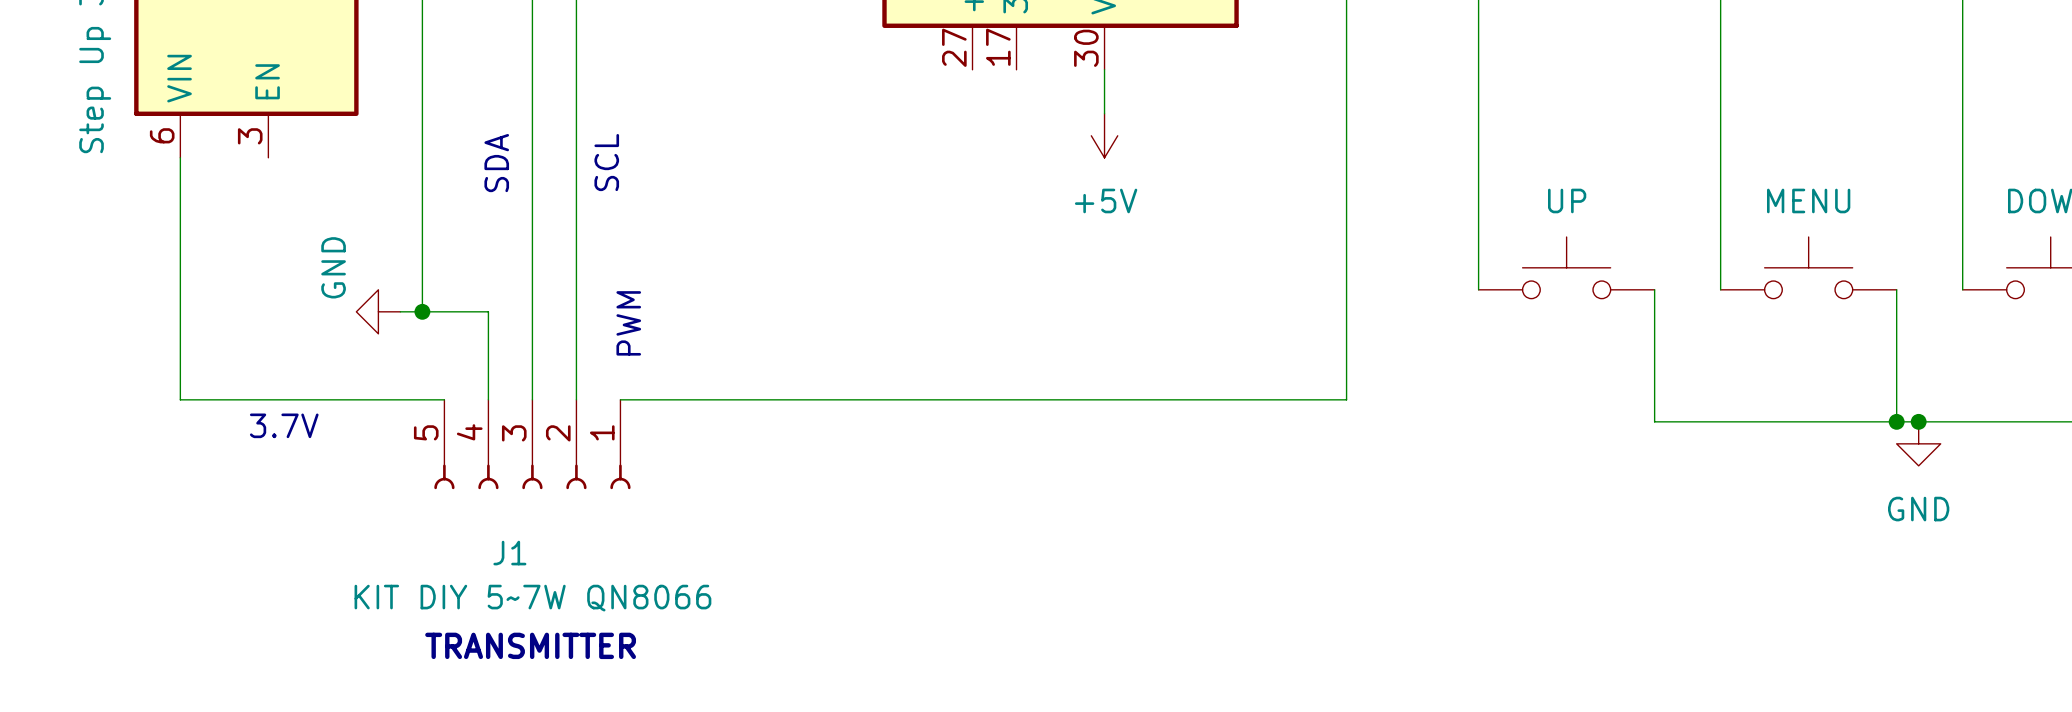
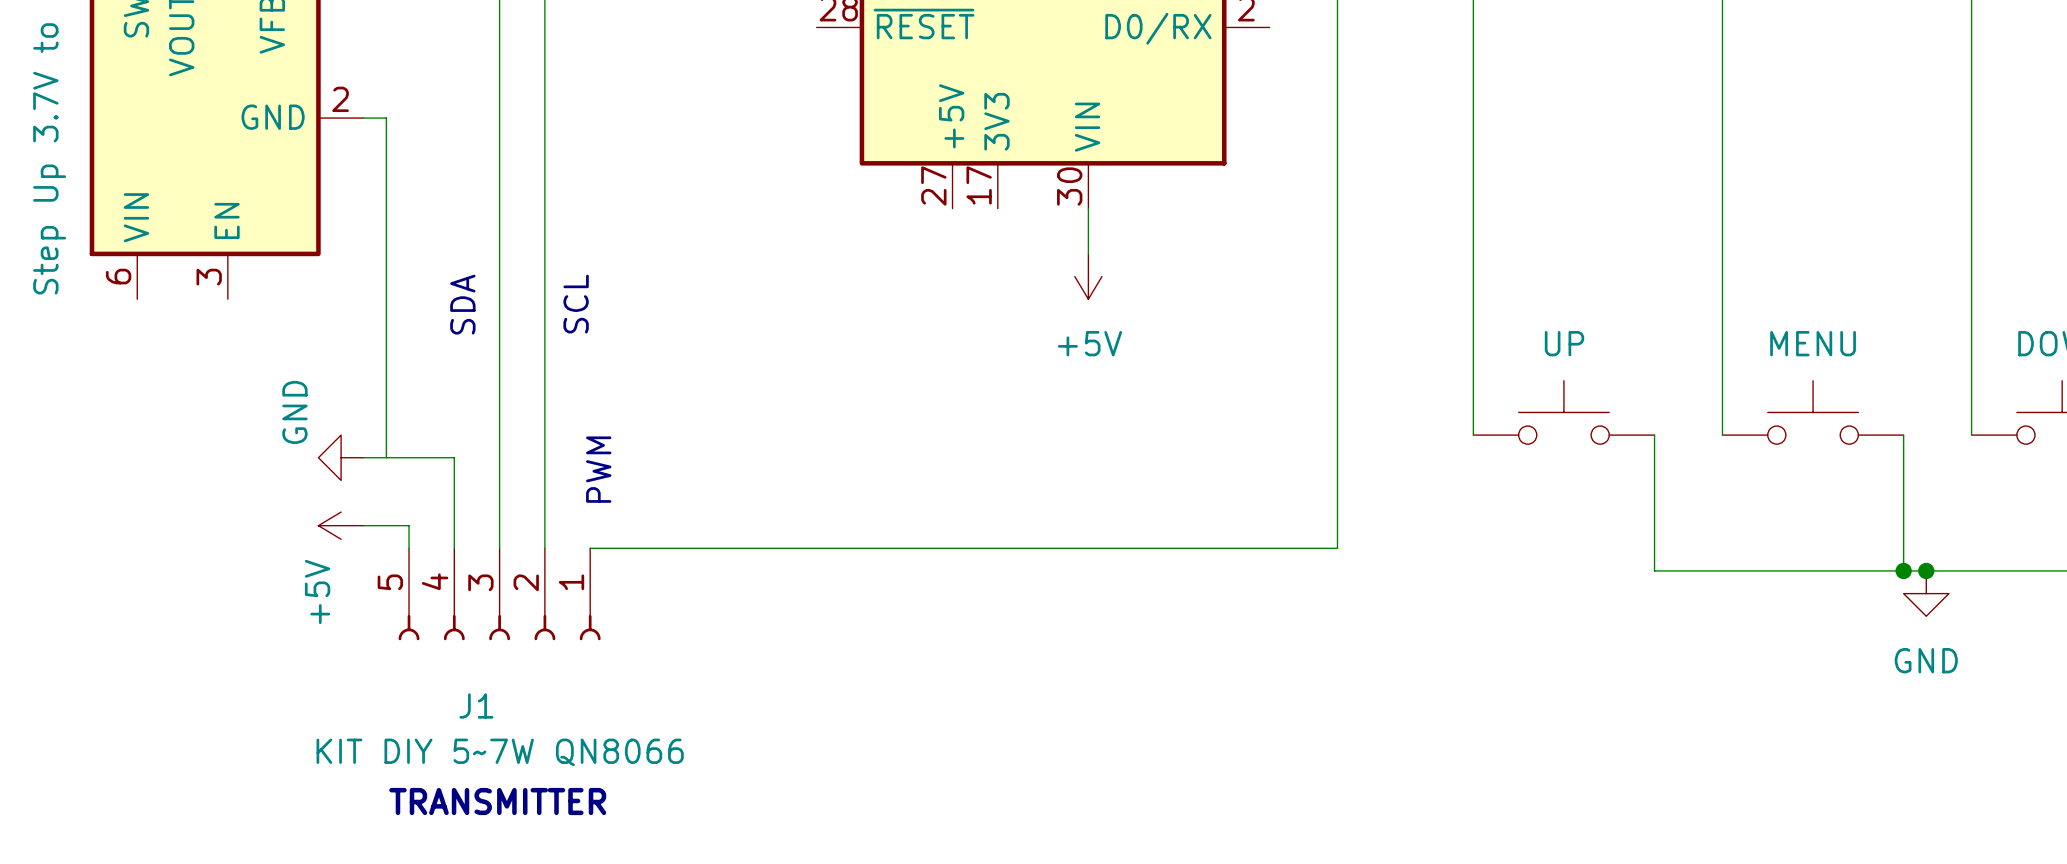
wire: (180, 157) (180, 399) (444, 399) -> (363, 525) (409, 525) (409, 548)
junction: (422, 311) -> none
power symbol: none -> +5V (341, 525)
text: 3.7V (284, 425) -> none

